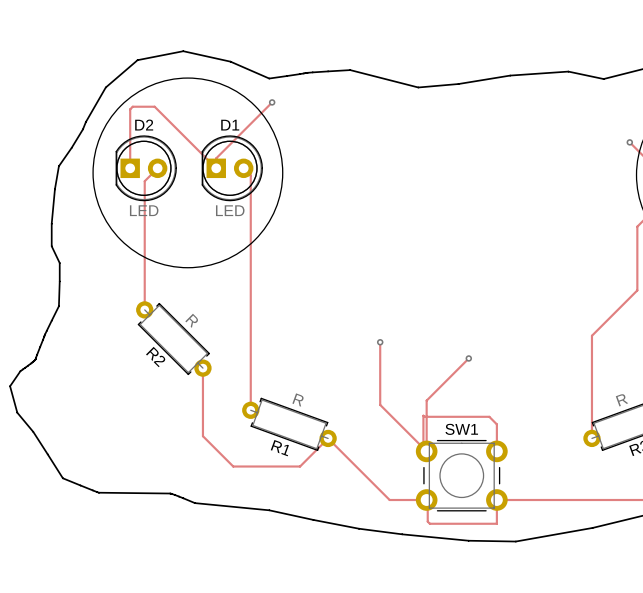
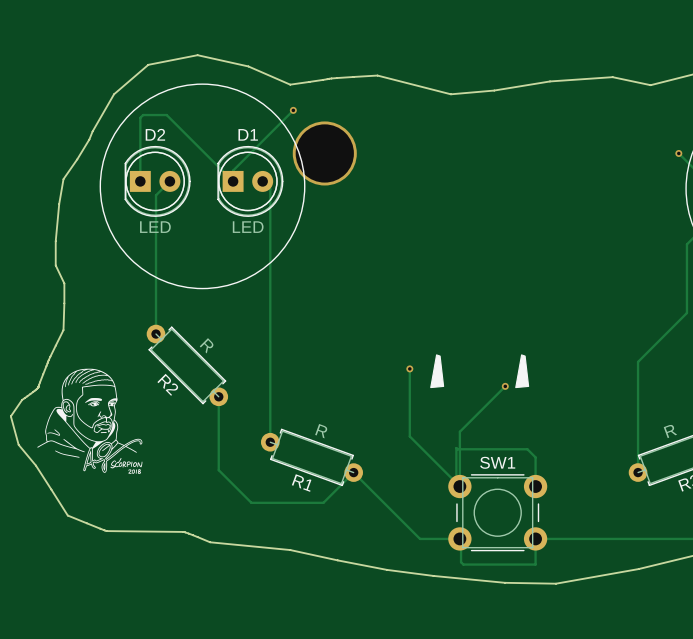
via: none -> (324, 153)
drawing: none -> [430, 354, 445, 389]
drawing: none -> [515, 354, 530, 389]
drawing: none -> [37, 368, 143, 474]

